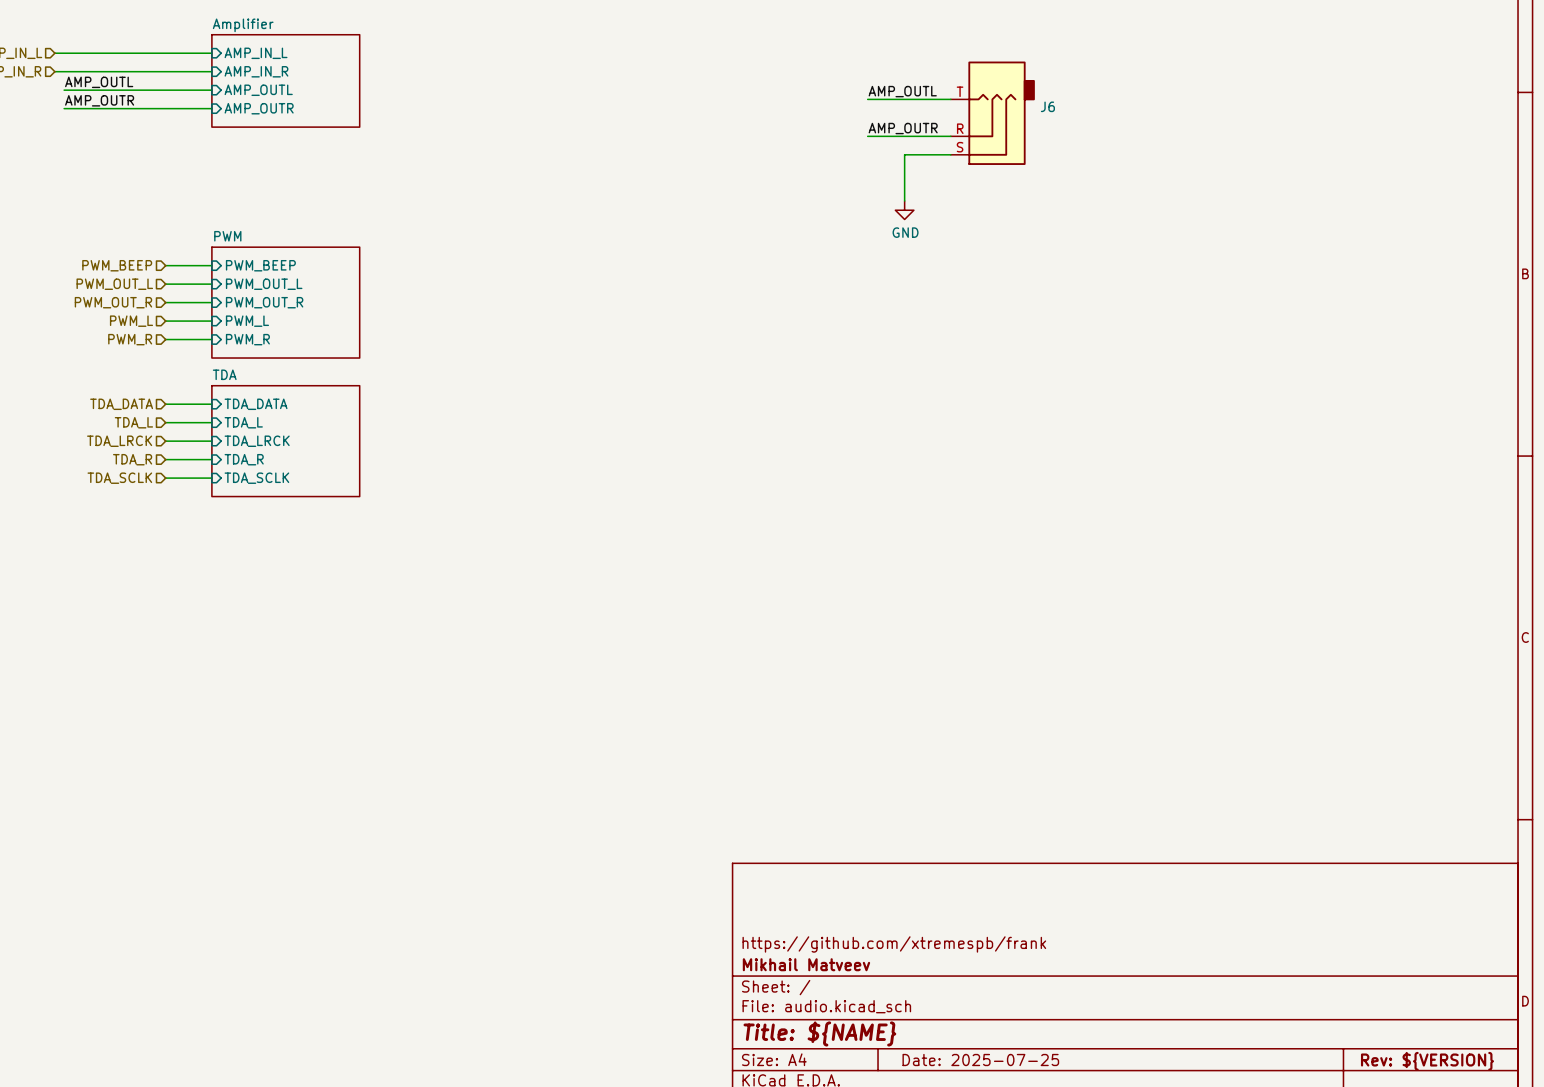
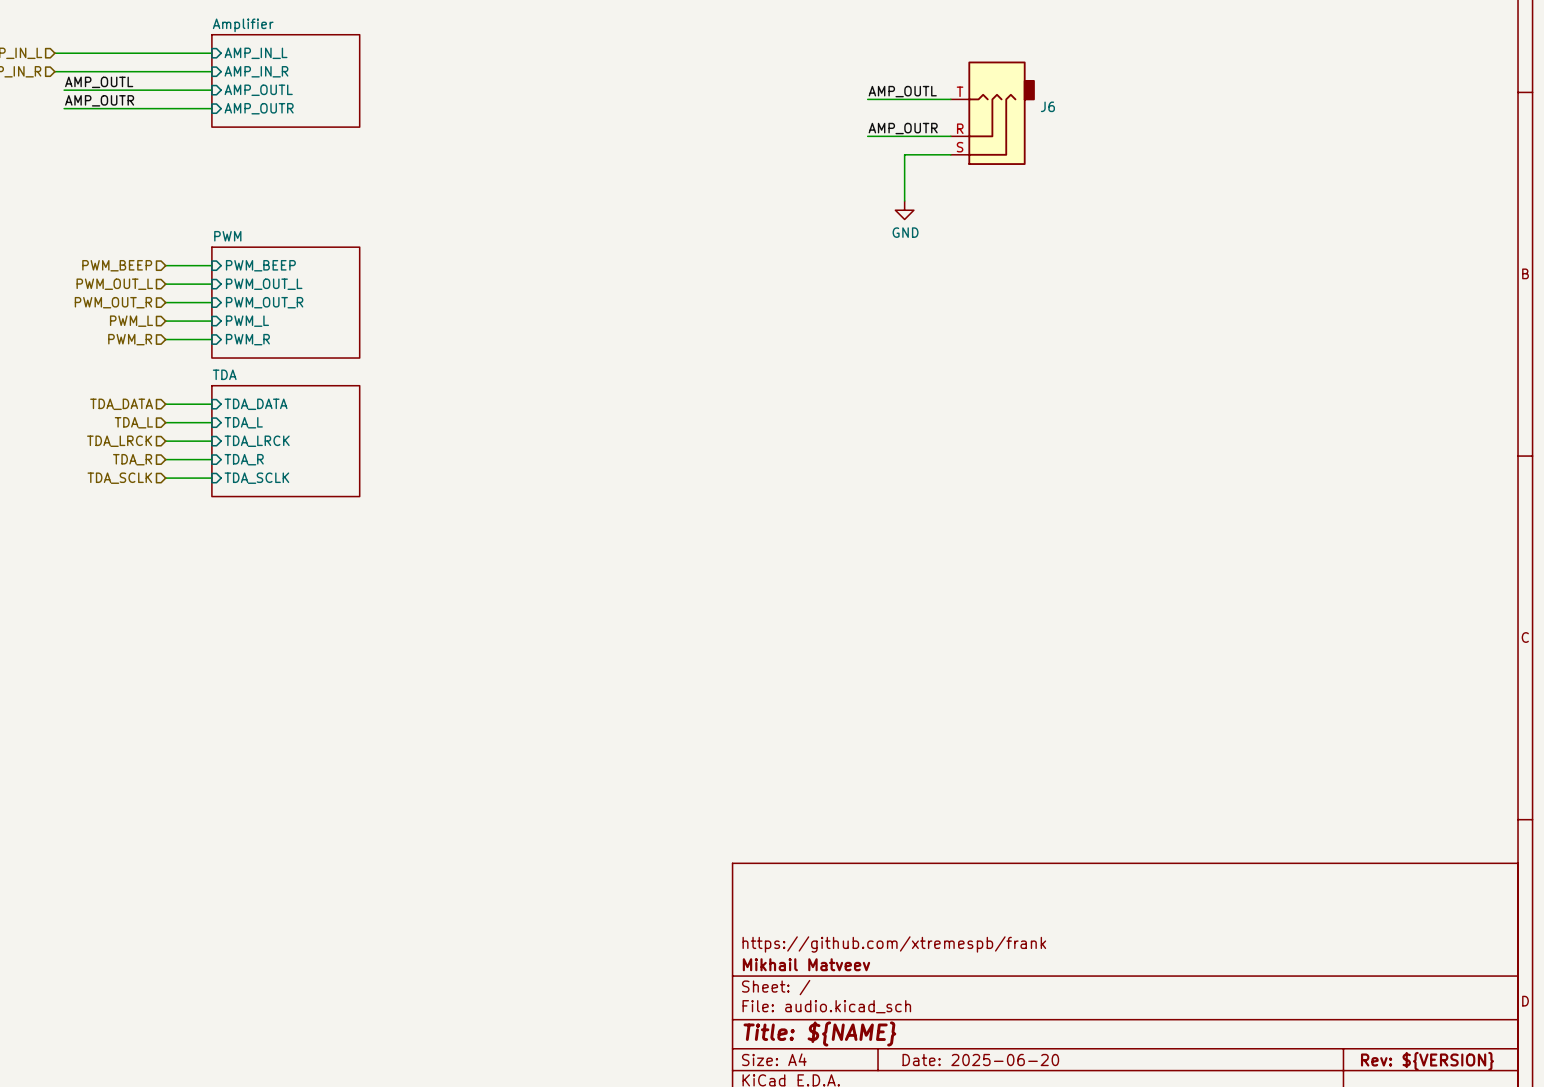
title block: Date: 2025-07-25 (980, 1060) -> Date: 2025-06-20 (980, 1060)

